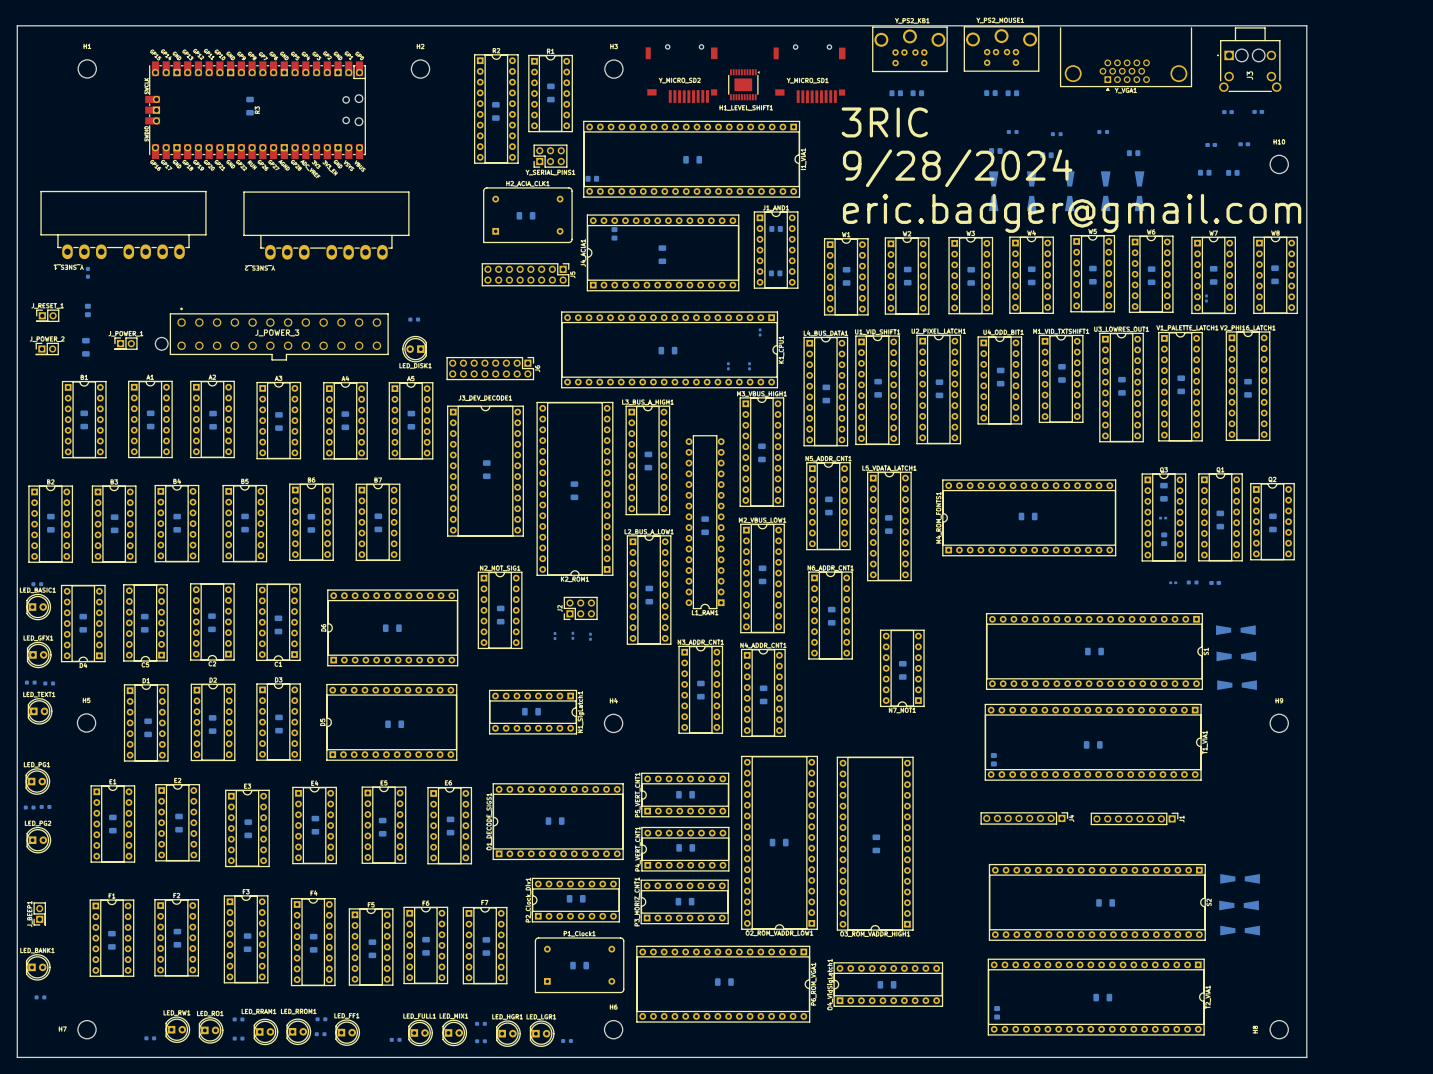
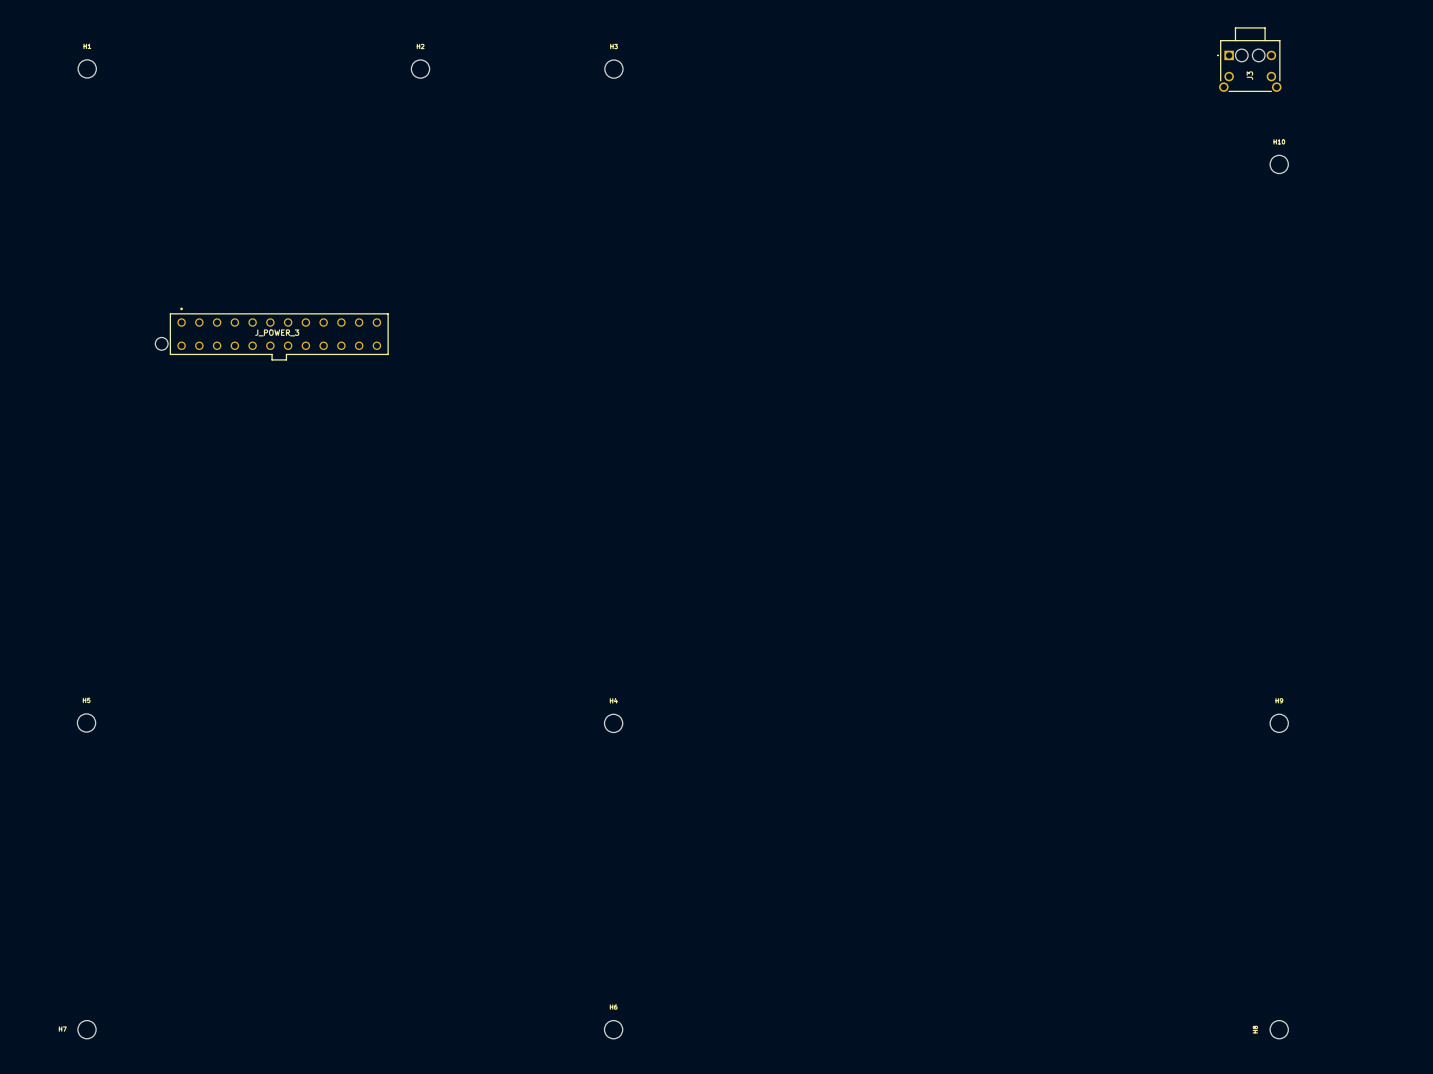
board edge: (17, 25) (1306, 25) (1306, 1057) (17, 1057) (17, 25) -> none
part: (1001, 48) -> none
part: (909, 49) -> none
part: (1126, 59) -> none
part: (681, 73) -> none
part: (809, 73) -> none
part: (743, 84) -> none
part: (550, 92) -> none
part: (550, 93) -> none
part: (896, 93) -> none
part: (917, 93) -> none
part: (990, 93) -> none
part: (1012, 93) -> none
part: (250, 106) -> none
part: (496, 109) -> none
part: (255, 110) -> none
part: (495, 111) -> none
part: (1258, 111) -> none
part: (1227, 112) -> none
text: 3RIC (884, 122) -> none
part: (1012, 132) -> none
part: (1103, 132) -> none
part: (1056, 134) -> none
part: (1211, 144) -> none
part: (1244, 144) -> none
part: (995, 151) -> none
part: (1133, 153) -> none
part: (1046, 155) -> none
part: (550, 156) -> none
part: (691, 159) -> none
part: (692, 159) -> none
text: 9/28/2024 (957, 168) -> none
part: (1204, 172) -> none
part: (1232, 172) -> none
part: (592, 178) -> none
part: (993, 191) -> none
part: (1031, 191) -> none
part: (1069, 191) -> none
part: (1105, 191) -> none
part: (1139, 191) -> none
text: eric.badger@gmail.com (1072, 213) -> none
part: (525, 215) -> none
part: (527, 215) -> none
part: (123, 225) -> none
part: (326, 225) -> none
part: (776, 228) -> none
part: (614, 233) -> none
part: (776, 250) -> none
part: (663, 252) -> none
part: (662, 254) -> none
part: (87, 272) -> none
part: (775, 273) -> none
part: (1092, 273) -> none
part: (525, 274) -> none
part: (1151, 274) -> none
part: (1275, 274) -> none
part: (970, 275) -> none
part: (1031, 275) -> none
part: (1031, 275) -> none
part: (1092, 275) -> none
part: (1151, 275) -> none
part: (1213, 275) -> none
part: (1213, 275) -> none
part: (1275, 275) -> none
part: (846, 276) -> none
part: (846, 276) -> none
part: (907, 276) -> none
part: (907, 276) -> none
part: (971, 276) -> none
part: (1206, 298) -> none
part: (87, 310) -> none
part: (47, 315) -> none
part: (414, 319) -> none
part: (760, 332) -> none
part: (125, 343) -> none
part: (85, 347) -> none
part: (47, 348) -> none
part: (414, 349) -> none
part: (669, 349) -> none
part: (667, 350) -> none
part: (728, 366) -> none
part: (749, 366) -> none
part: (490, 368) -> none
part: (1061, 373) -> none
part: (1000, 377) -> none
part: (1061, 378) -> none
part: (999, 380) -> none
part: (1181, 384) -> none
part: (1121, 386) -> none
part: (1180, 386) -> none
part: (1248, 386) -> none
part: (1121, 387) -> none
part: (878, 388) -> none
part: (939, 388) -> none
part: (1248, 388) -> none
part: (938, 389) -> none
part: (877, 390) -> none
part: (825, 391) -> none
part: (826, 393) -> none
part: (84, 419) -> none
part: (84, 419) -> none
part: (150, 419) -> none
part: (150, 419) -> none
part: (212, 419) -> none
part: (213, 420) -> none
part: (278, 420) -> none
part: (345, 420) -> none
part: (345, 420) -> none
part: (411, 420) -> none
part: (411, 420) -> none
part: (278, 421) -> none
part: (761, 452) -> none
part: (761, 452) -> none
part: (647, 460) -> none
part: (648, 461) -> none
part: (486, 469) -> none
part: (485, 471) -> none
part: (574, 488) -> none
part: (574, 490) -> none
part: (1163, 492) -> none
part: (828, 505) -> none
part: (828, 506) -> none
part: (1028, 516) -> none
part: (1029, 517) -> none
part: (1163, 517) -> none
part: (1220, 517) -> none
part: (1163, 518) -> none
part: (1220, 520) -> none
part: (1272, 521) -> none
part: (311, 522) -> none
part: (378, 522) -> none
part: (378, 522) -> none
part: (705, 522) -> none
part: (1272, 522) -> none
part: (50, 523) -> none
part: (114, 523) -> none
part: (176, 523) -> none
part: (177, 523) -> none
part: (244, 523) -> none
part: (245, 523) -> none
part: (311, 523) -> none
part: (50, 524) -> none
part: (114, 524) -> none
part: (888, 524) -> none
part: (705, 525) -> none
part: (889, 526) -> none
part: (1164, 539) -> none
part: (762, 574) -> none
part: (762, 578) -> none
part: (1173, 582) -> none
part: (1192, 582) -> none
part: (1215, 582) -> none
part: (37, 584) -> none
part: (649, 590) -> none
part: (649, 595) -> none
part: (38, 607) -> none
part: (580, 608) -> none
part: (500, 610) -> none
part: (500, 615) -> none
part: (830, 615) -> none
part: (831, 616) -> none
part: (212, 621) -> none
part: (145, 622) -> none
part: (211, 622) -> none
part: (278, 622) -> none
part: (83, 623) -> none
part: (83, 623) -> none
part: (144, 623) -> none
part: (278, 624) -> none
part: (392, 627) -> none
part: (392, 628) -> none
part: (1235, 630) -> none
part: (572, 635) -> none
part: (555, 636) -> none
part: (590, 636) -> none
part: (1094, 651) -> none
part: (1094, 651) -> none
part: (39, 654) -> none
part: (1236, 656) -> none
part: (902, 668) -> none
part: (902, 670) -> none
part: (30, 682) -> none
part: (49, 683) -> none
part: (1237, 685) -> none
part: (700, 689) -> none
part: (700, 690) -> none
part: (763, 692) -> none
part: (763, 694) -> none
part: (40, 711) -> none
part: (531, 711) -> none
part: (533, 712) -> none
part: (146, 722) -> none
part: (213, 722) -> none
part: (278, 722) -> none
part: (391, 722) -> none
part: (212, 724) -> none
part: (278, 724) -> none
part: (394, 724) -> none
part: (148, 727) -> none
part: (1093, 742) -> none
part: (1093, 744) -> none
part: (993, 759) -> none
part: (37, 781) -> none
part: (685, 794) -> none
part: (685, 795) -> none
part: (45, 806) -> none
part: (29, 807) -> none
part: (1024, 818) -> none
part: (1134, 818) -> none
part: (555, 821) -> none
part: (558, 821) -> none
part: (177, 822) -> none
part: (179, 823) -> none
part: (112, 824) -> none
part: (112, 824) -> none
part: (314, 825) -> none
part: (315, 825) -> none
part: (383, 825) -> none
part: (449, 825) -> none
part: (450, 826) -> none
part: (382, 827) -> none
part: (247, 828) -> none
part: (248, 828) -> none
part: (38, 840) -> none
part: (779, 842) -> none
part: (779, 842) -> none
part: (875, 843) -> none
part: (876, 843) -> none
part: (685, 847) -> none
part: (685, 849) -> none
part: (1240, 878) -> none
part: (576, 898) -> none
part: (575, 900) -> none
part: (684, 901) -> none
part: (685, 901) -> none
part: (1097, 902) -> none
part: (1105, 902) -> none
part: (1239, 905) -> none
part: (39, 913) -> none
part: (1240, 930) -> none
part: (176, 937) -> none
part: (111, 938) -> none
part: (177, 938) -> none
part: (246, 939) -> none
part: (111, 940) -> none
part: (247, 942) -> none
part: (313, 942) -> none
part: (313, 943) -> none
part: (425, 945) -> none
part: (485, 945) -> none
part: (426, 946) -> none
part: (486, 946) -> none
part: (371, 947) -> none
part: (372, 948) -> none
part: (579, 965) -> none
part: (579, 965) -> none
part: (38, 967) -> none
part: (724, 982) -> none
part: (723, 984) -> none
part: (887, 984) -> none
part: (888, 984) -> none
part: (40, 997) -> none
part: (1096, 997) -> none
part: (1102, 997) -> none
part: (997, 1012) -> none
part: (238, 1019) -> none
part: (321, 1019) -> none
part: (480, 1023) -> none
part: (177, 1029) -> none
part: (211, 1030) -> none
part: (265, 1031) -> none
part: (298, 1031) -> none
part: (347, 1032) -> none
part: (420, 1032) -> none
part: (454, 1032) -> none
part: (508, 1033) -> none
part: (542, 1033) -> none
part: (320, 1034) -> none
part: (150, 1038) -> none
part: (238, 1038) -> none
part: (395, 1039) -> none
part: (481, 1041) -> none
part: (567, 1041) -> none

